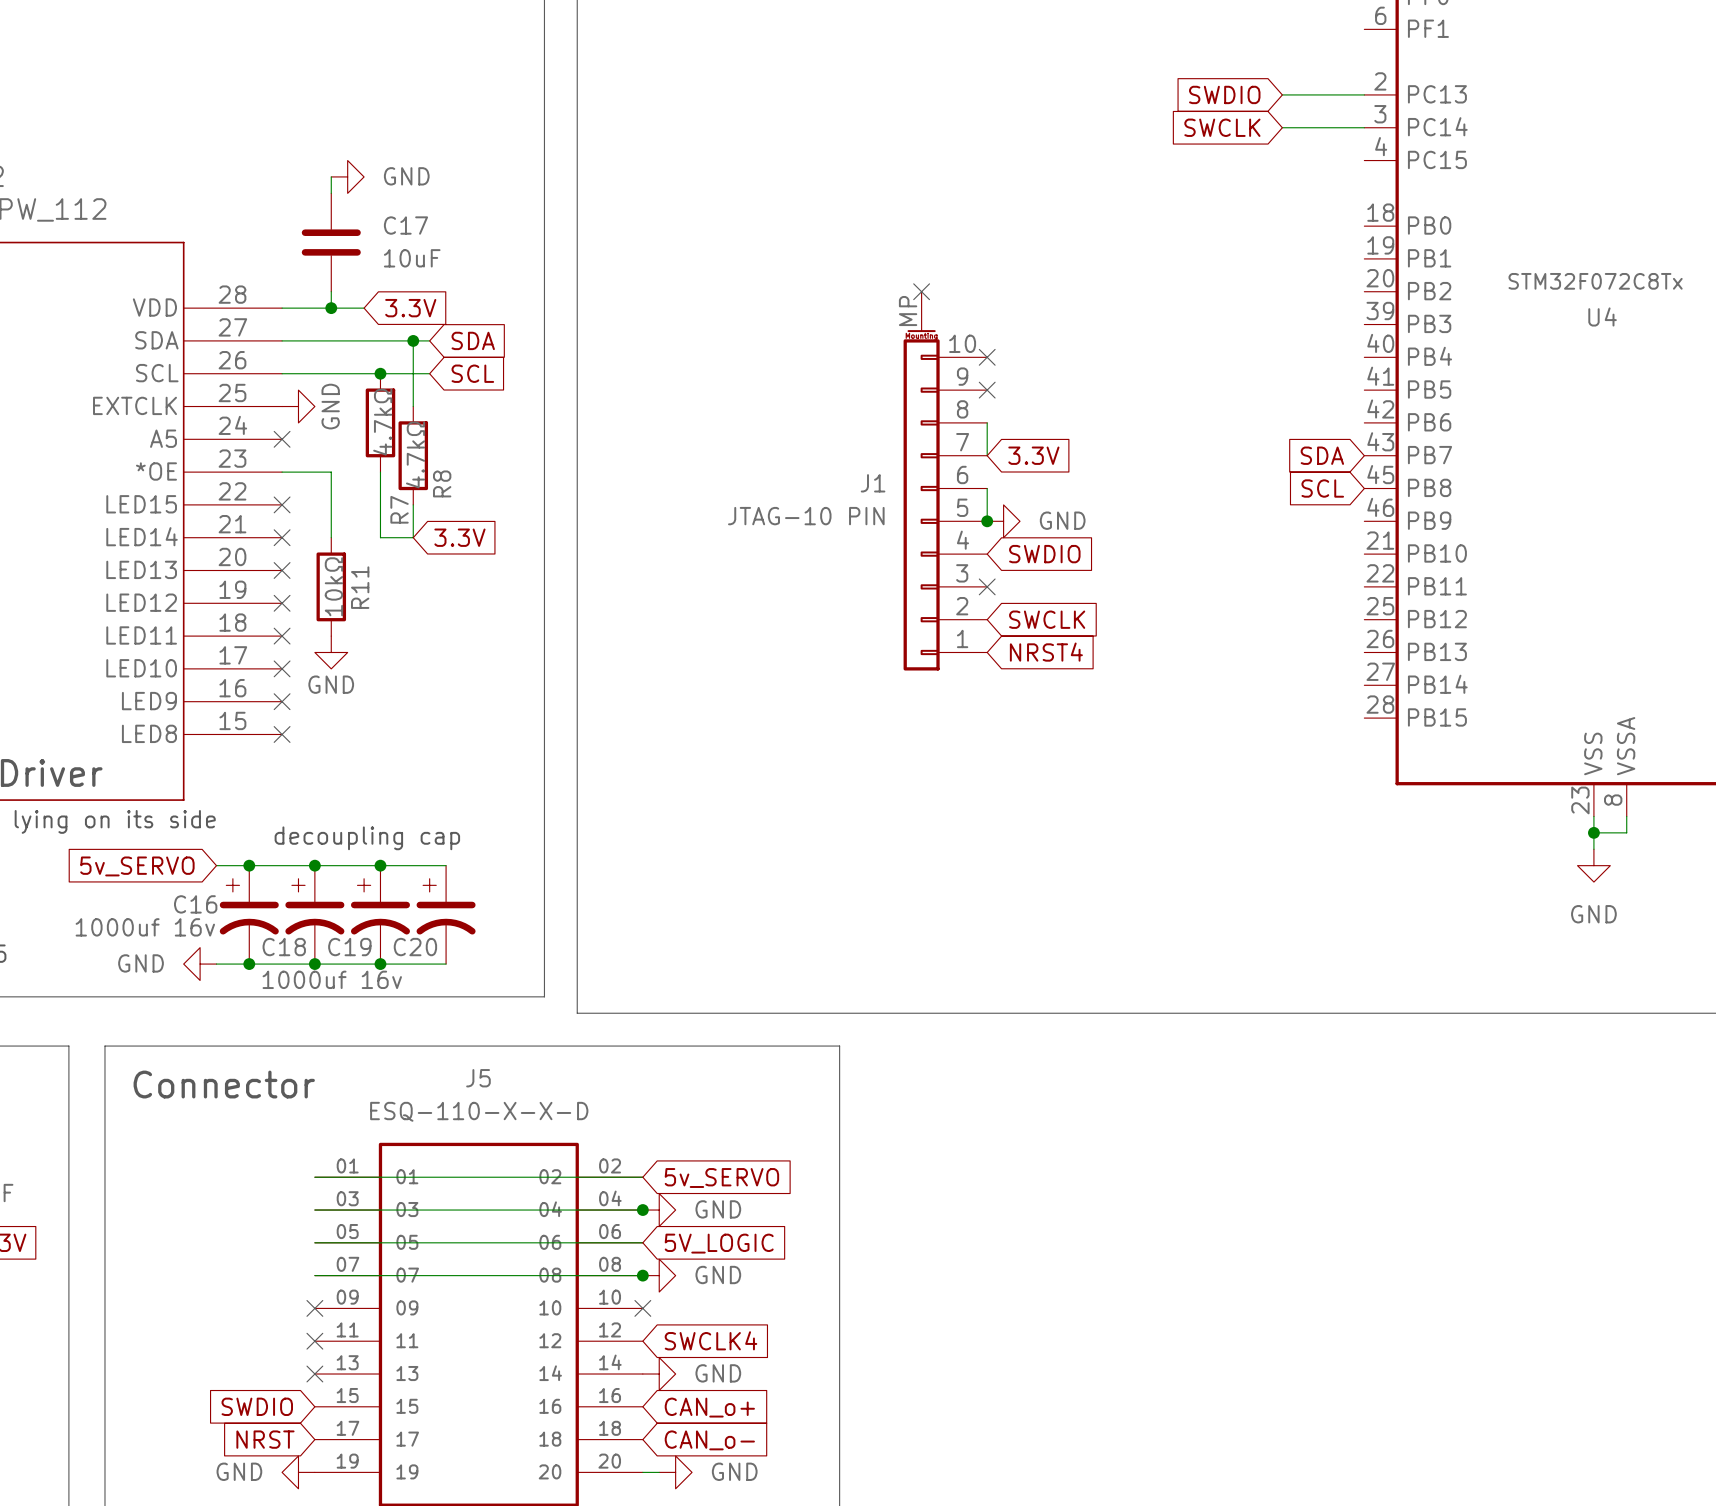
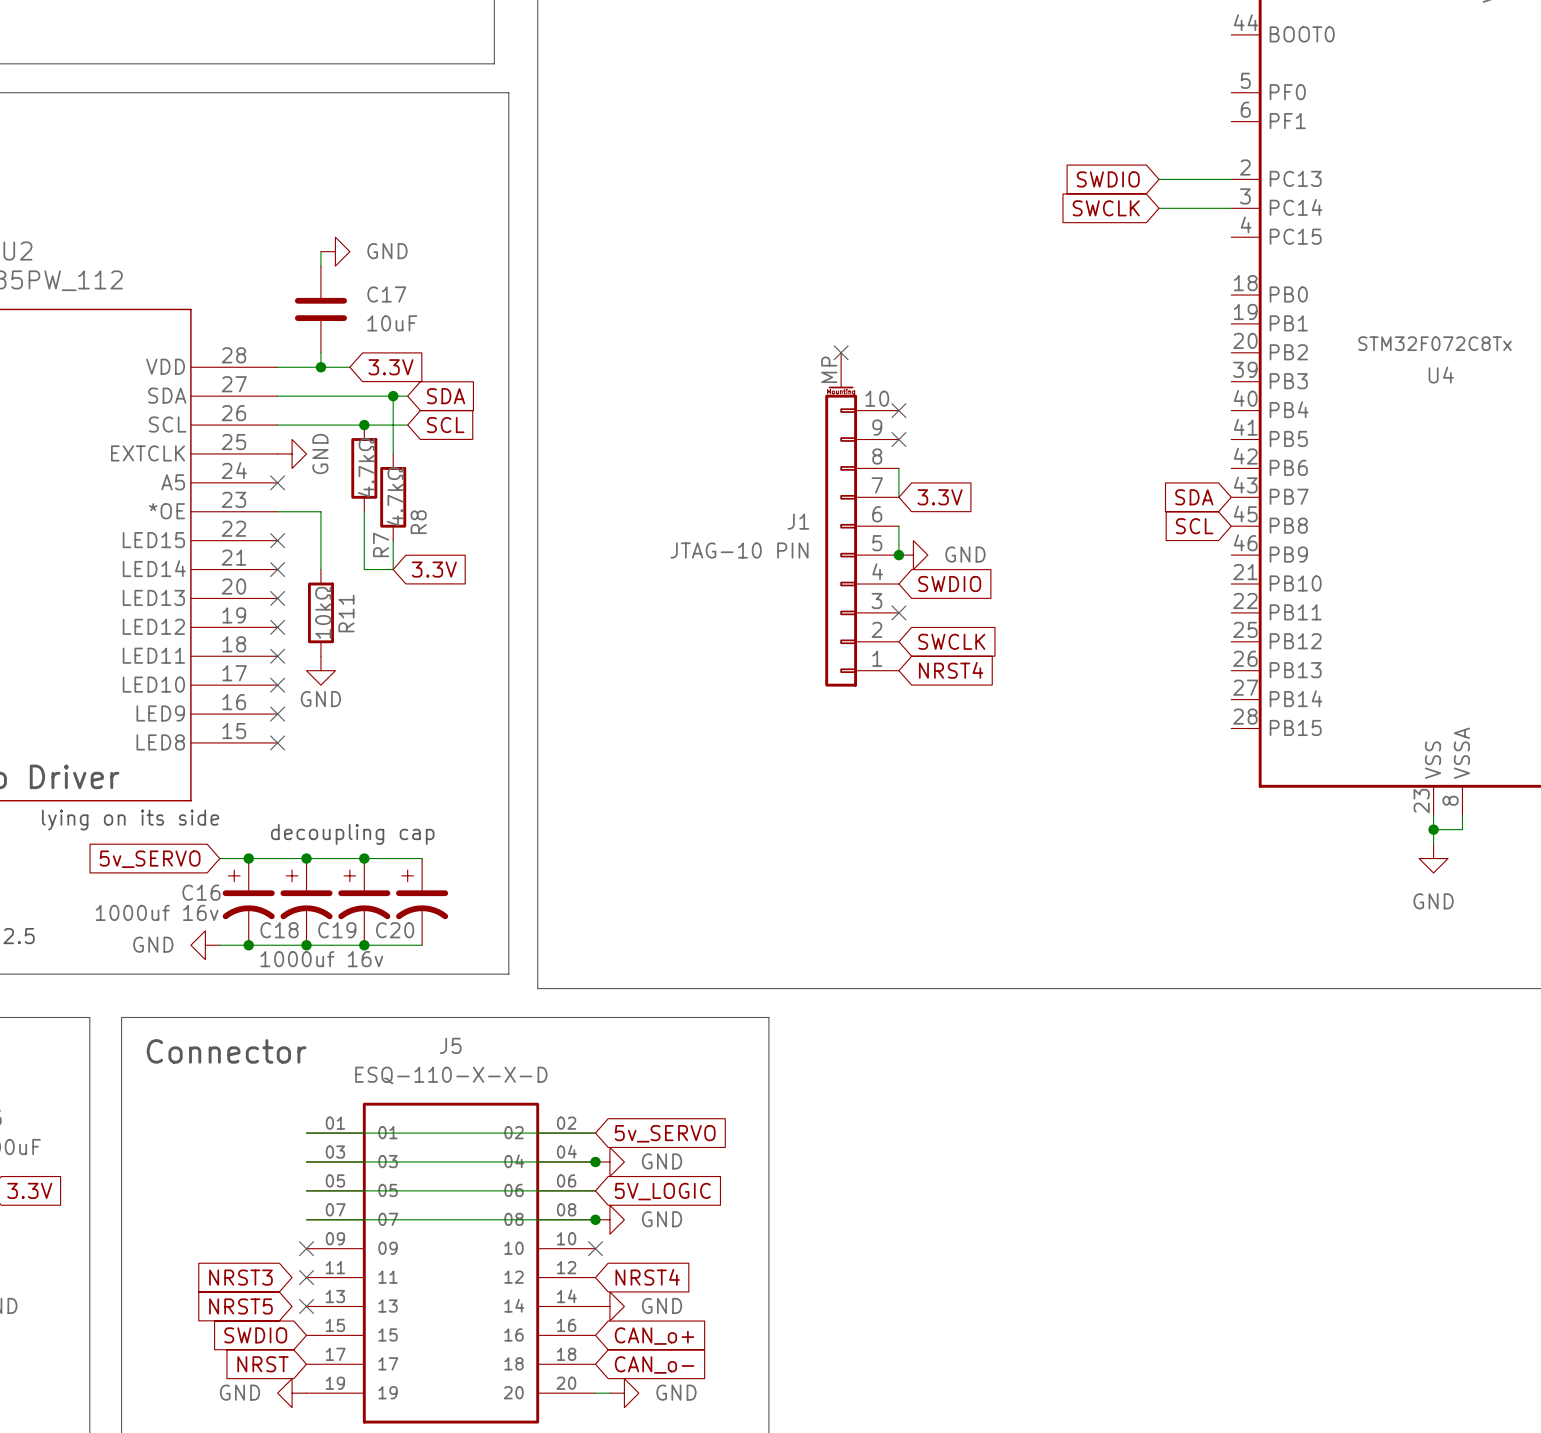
global label: SWCLK4 (711, 1340) -> NRST4 (647, 1277)
global label: none -> NRST3 (240, 1277)
global label: none -> NRST5 (240, 1306)

